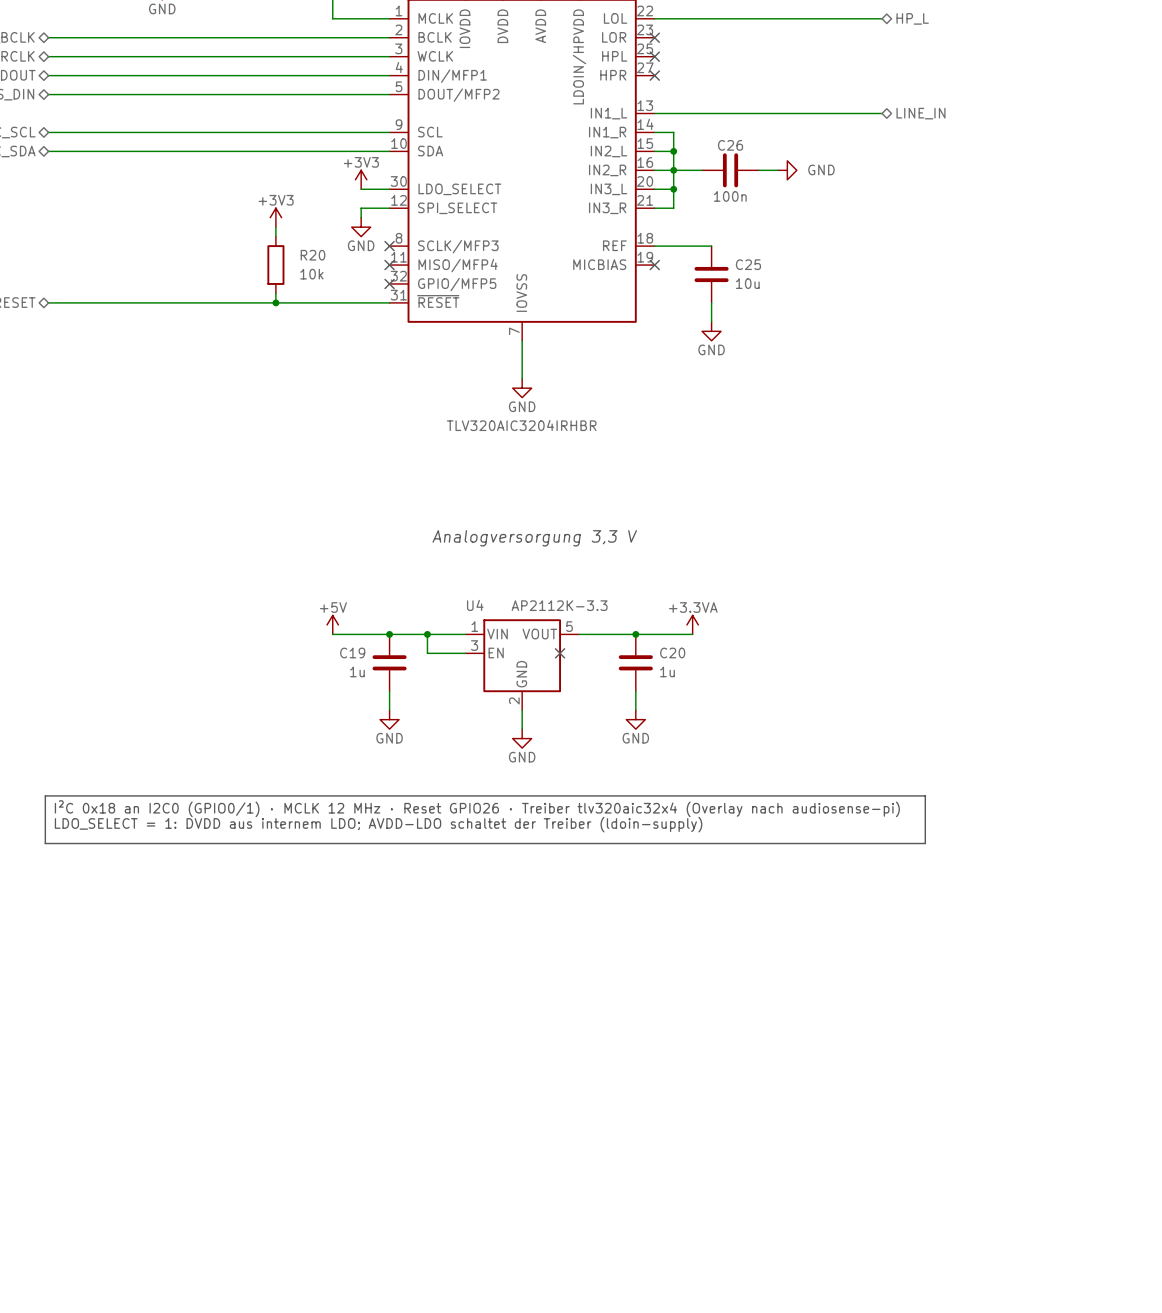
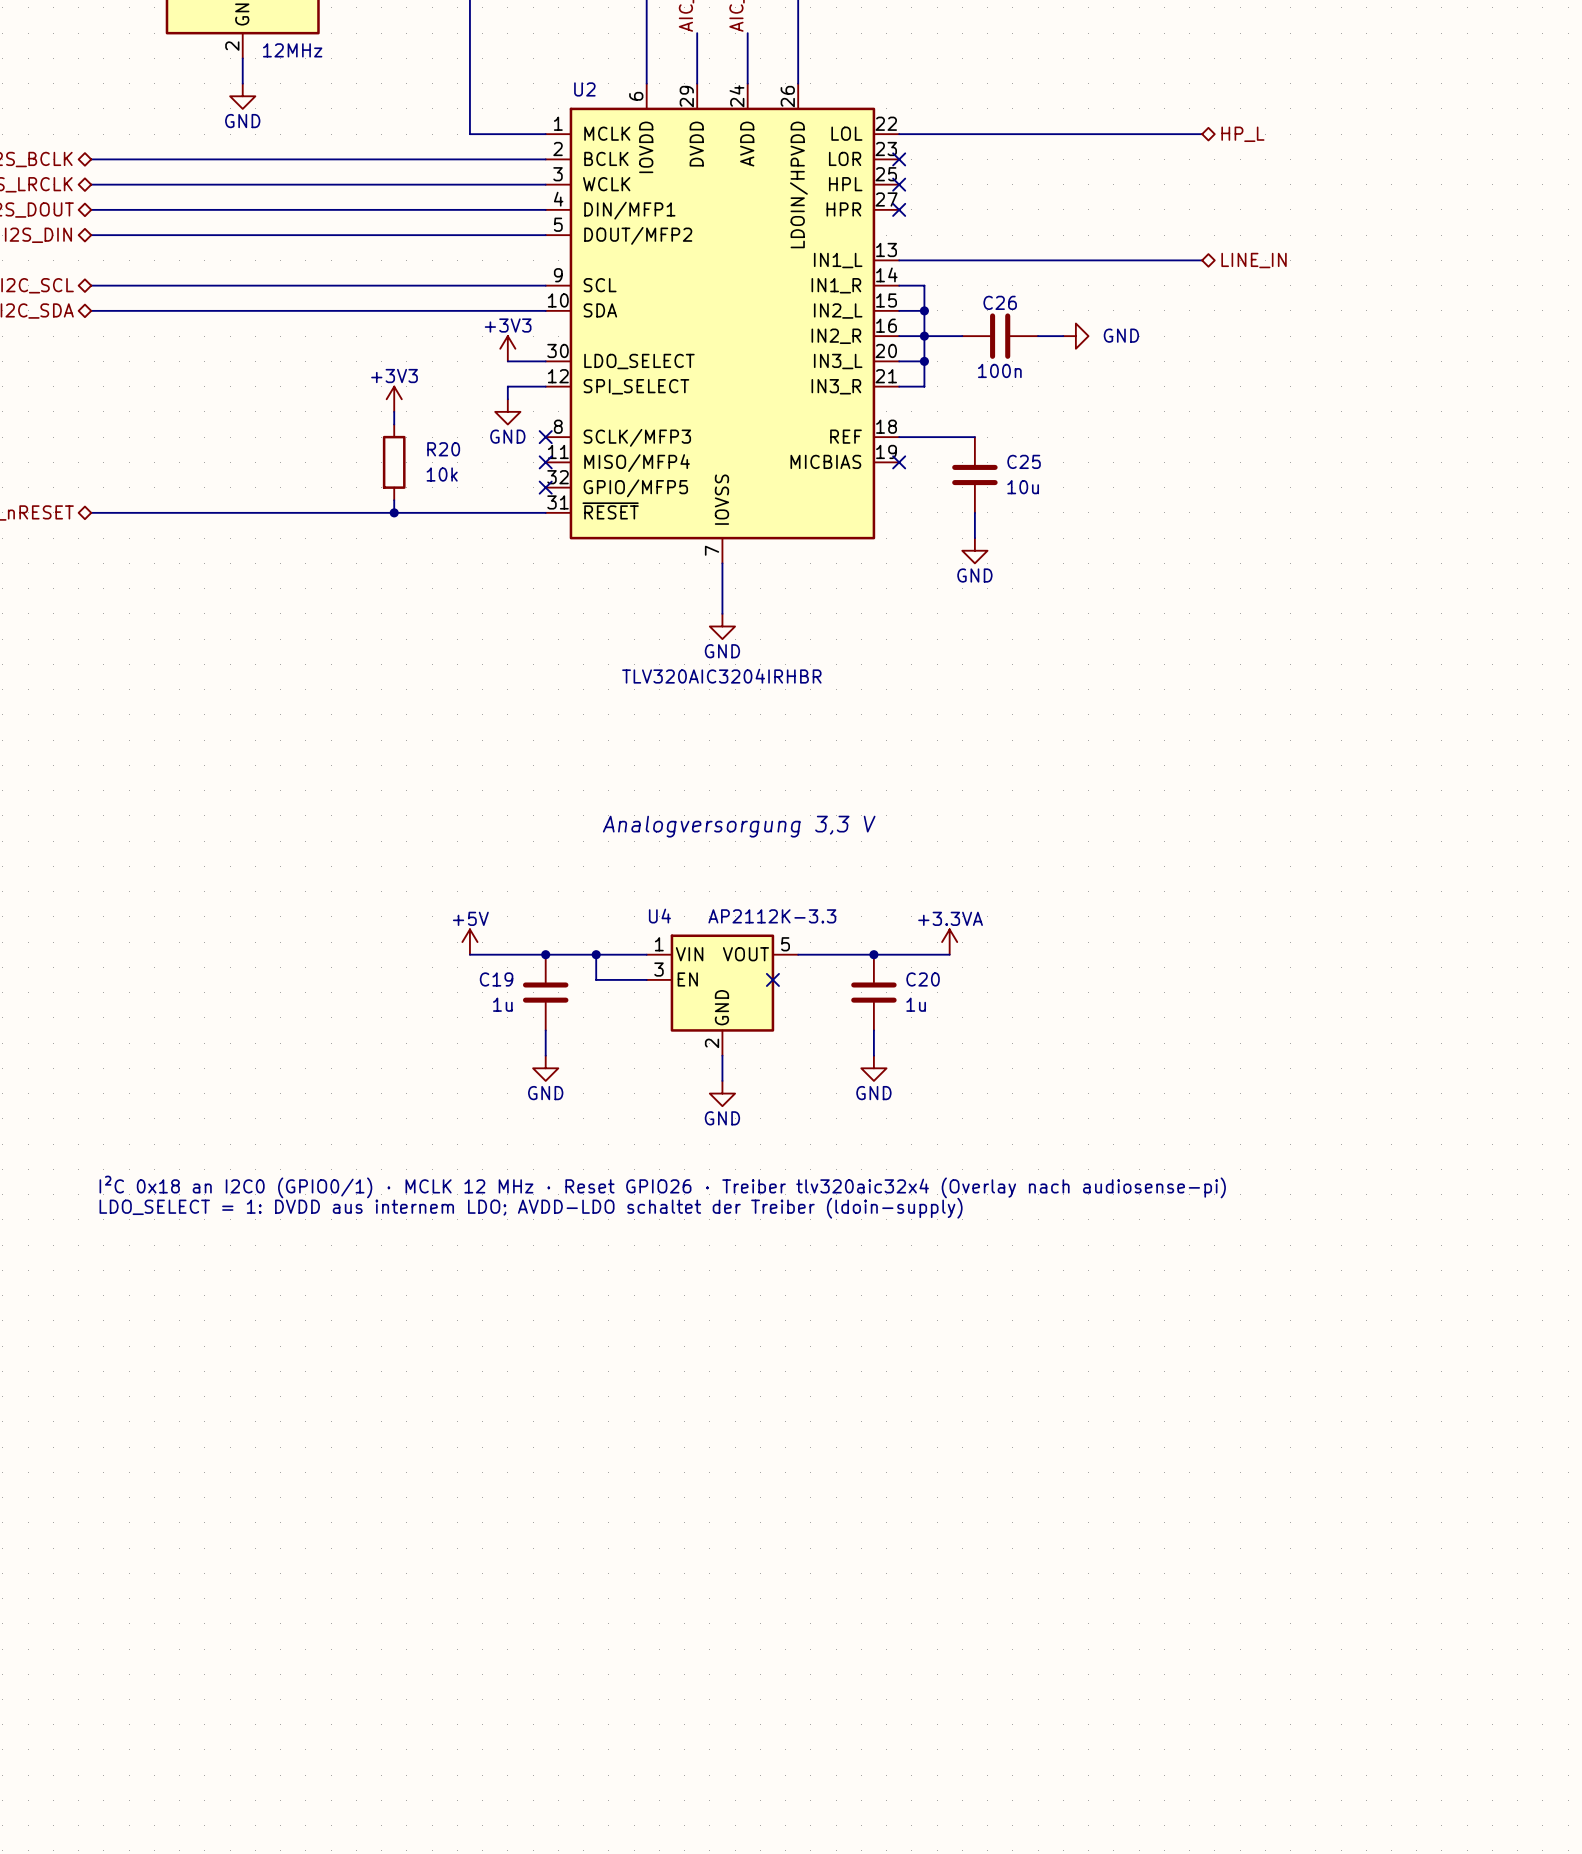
line: (45, 795) (925, 795) (925, 843) (45, 843) (45, 795) -> none

